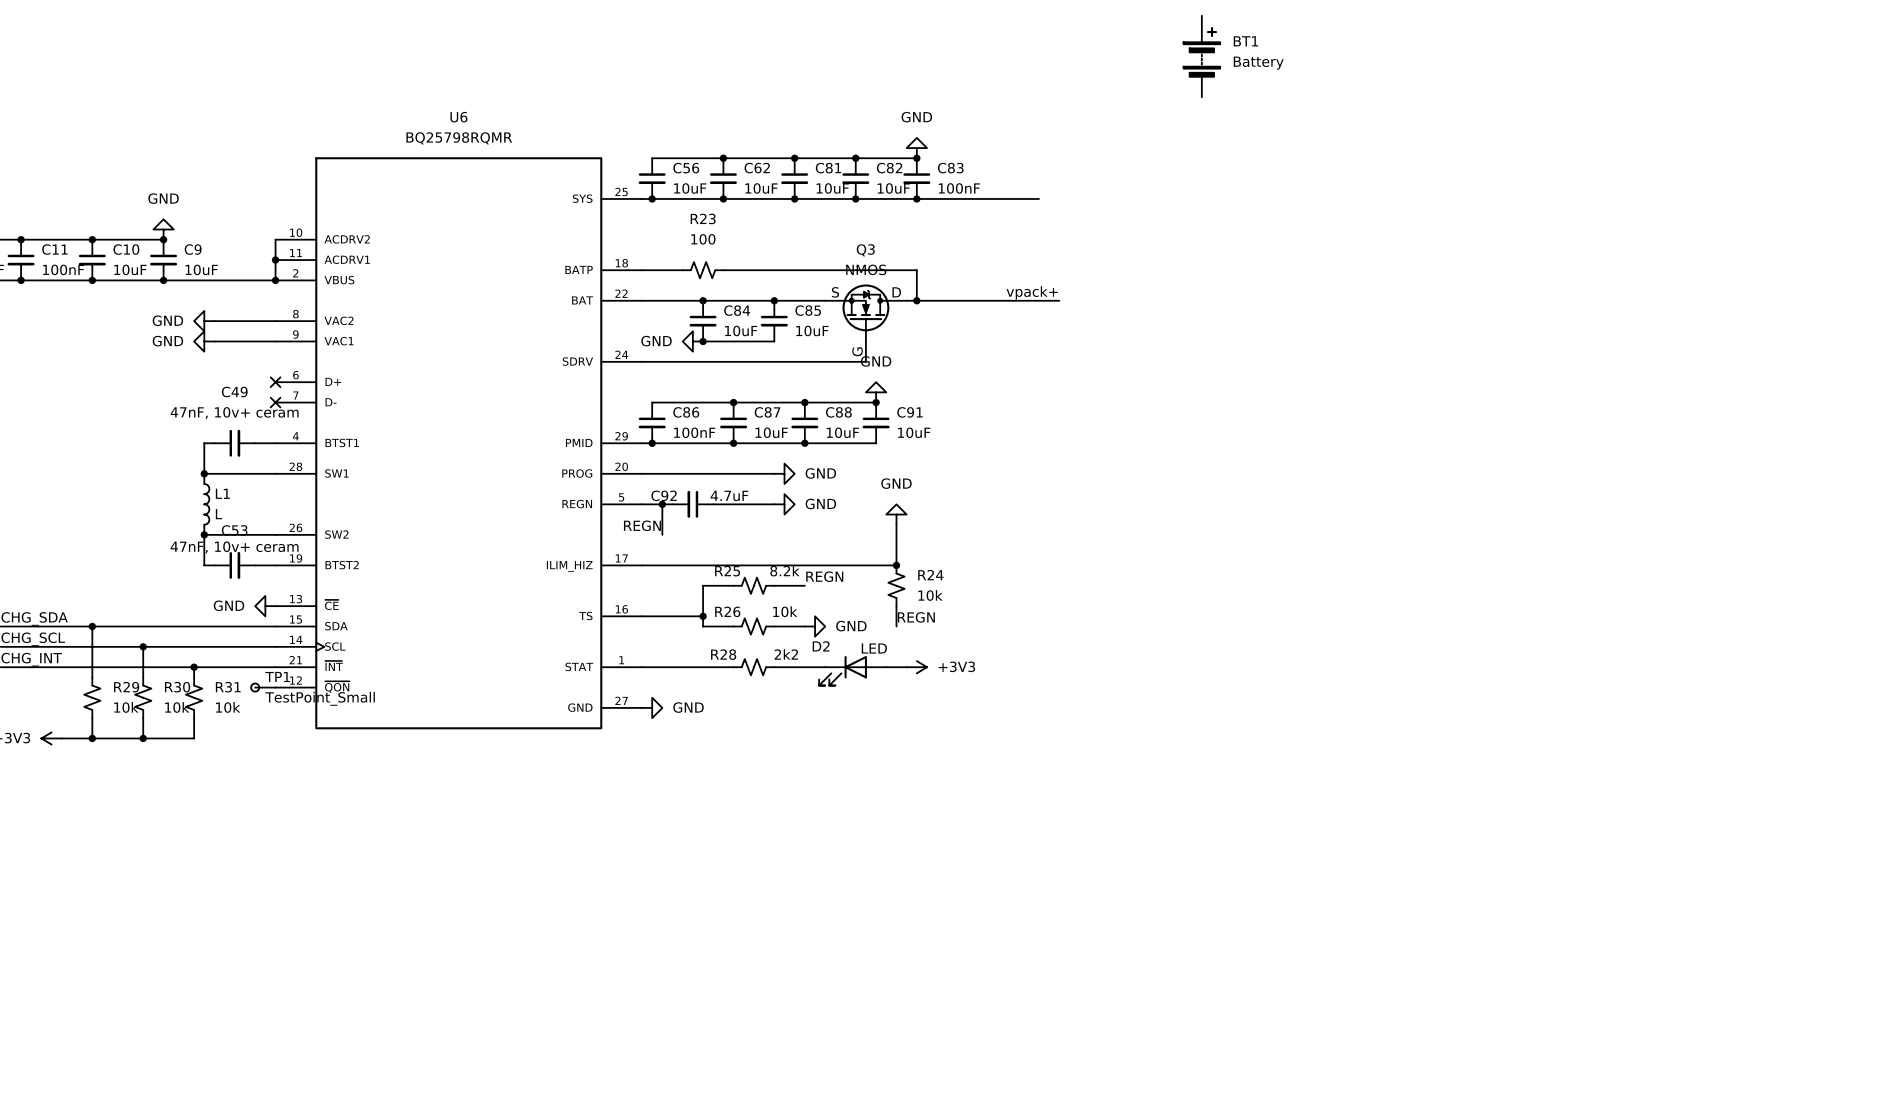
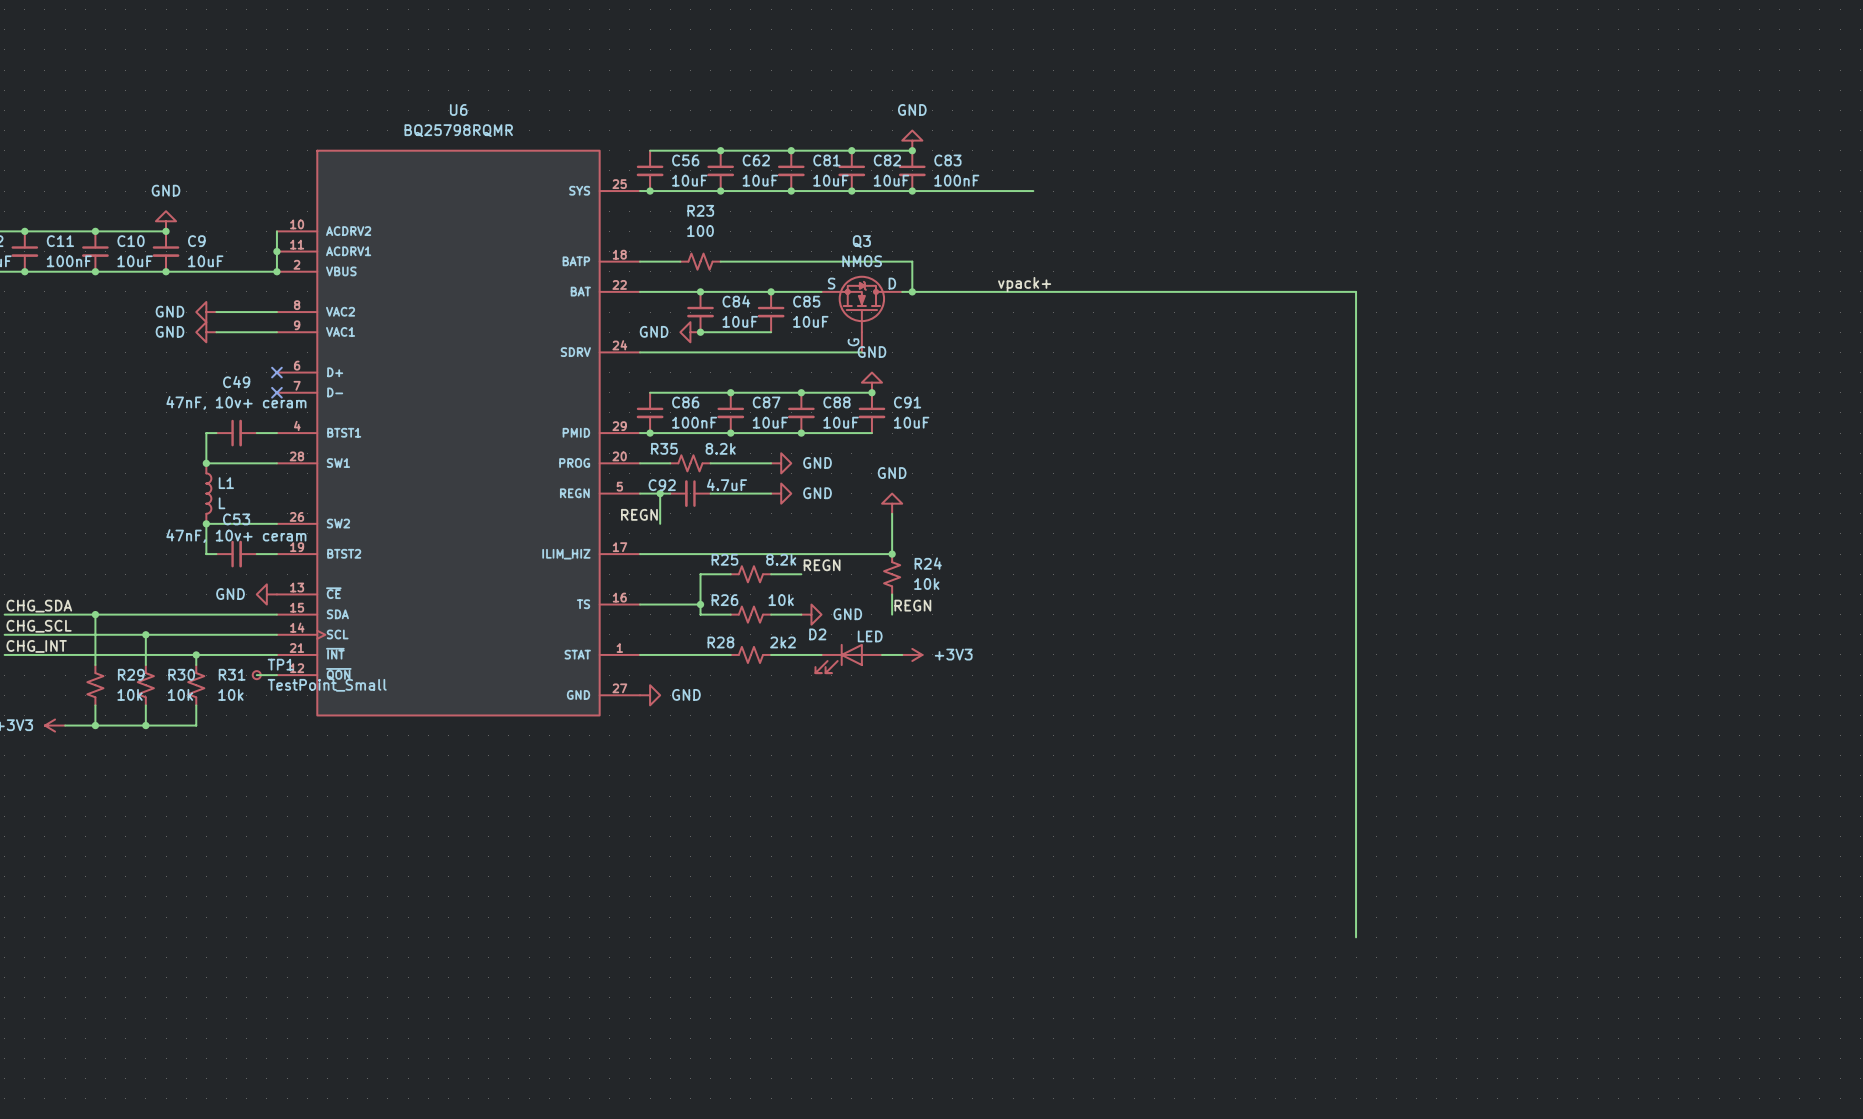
BT1: Battery (1201, 56) -> none
wire: none -> (1053, 291) (1356, 291) (1356, 937)
R35: none -> 8.2k (690, 463)

